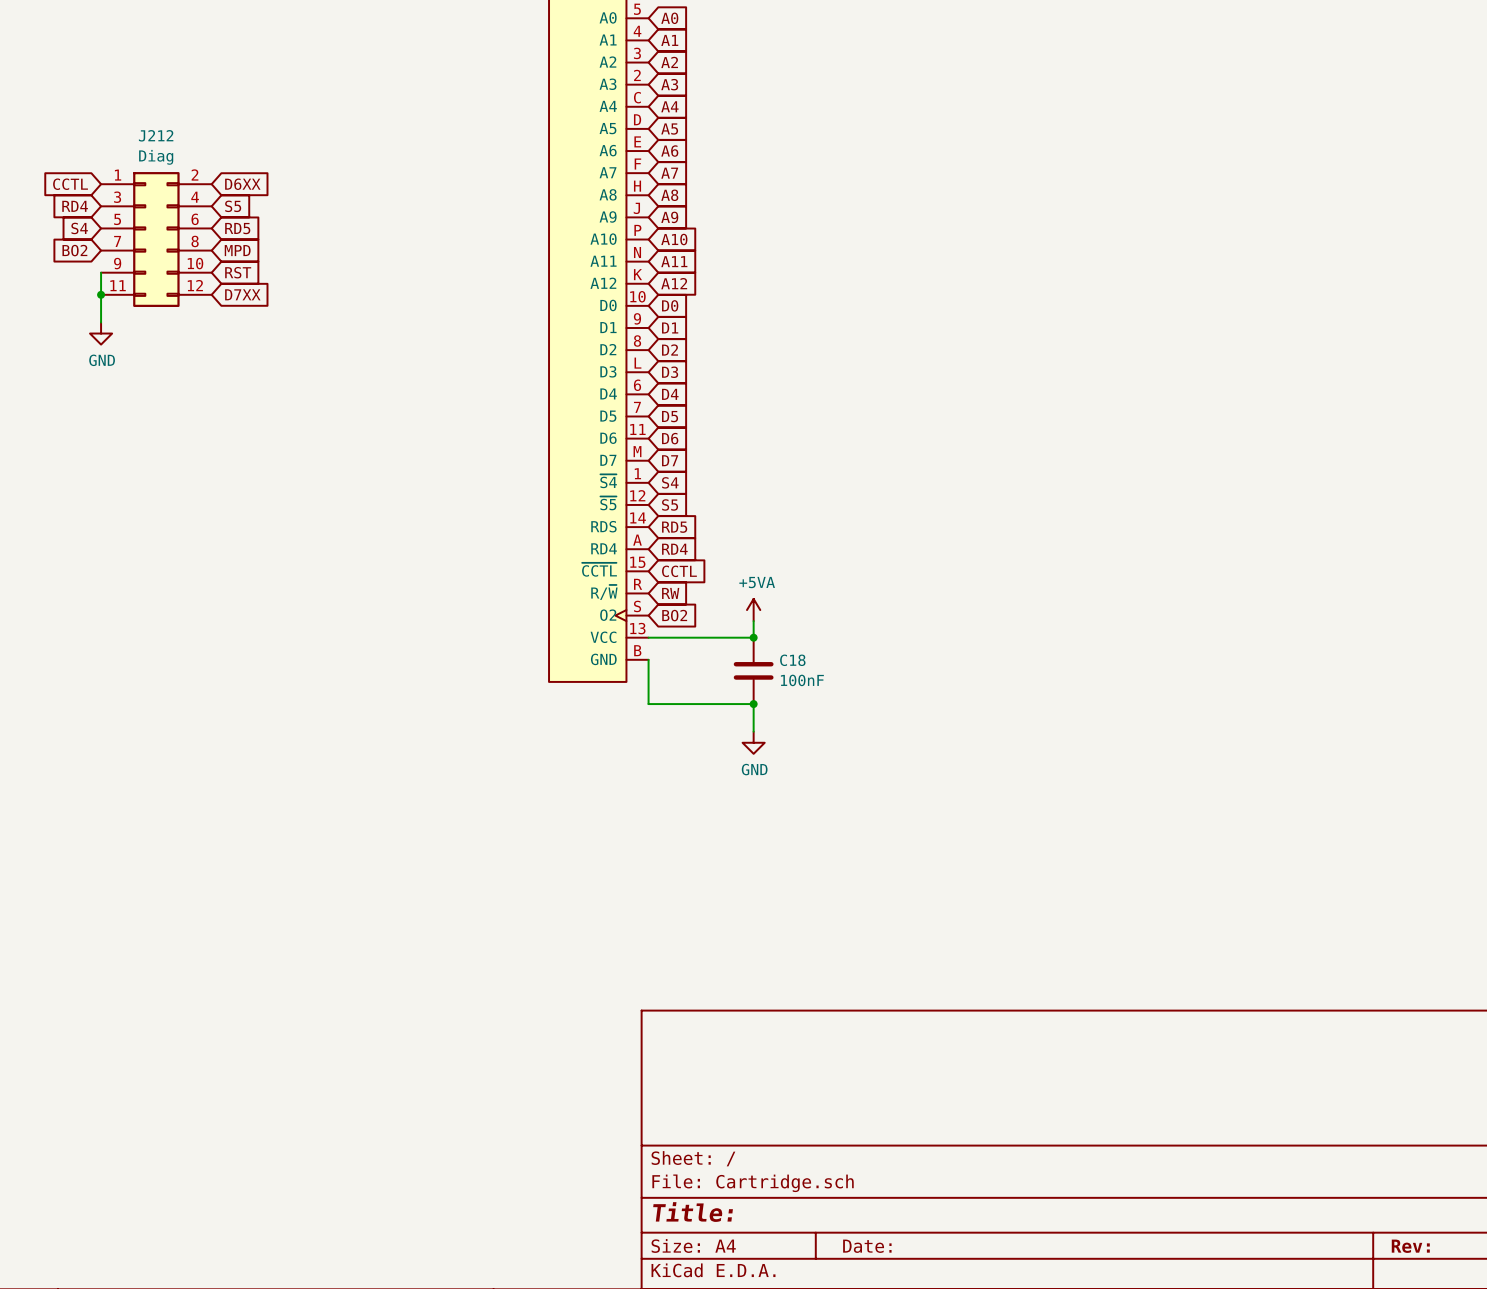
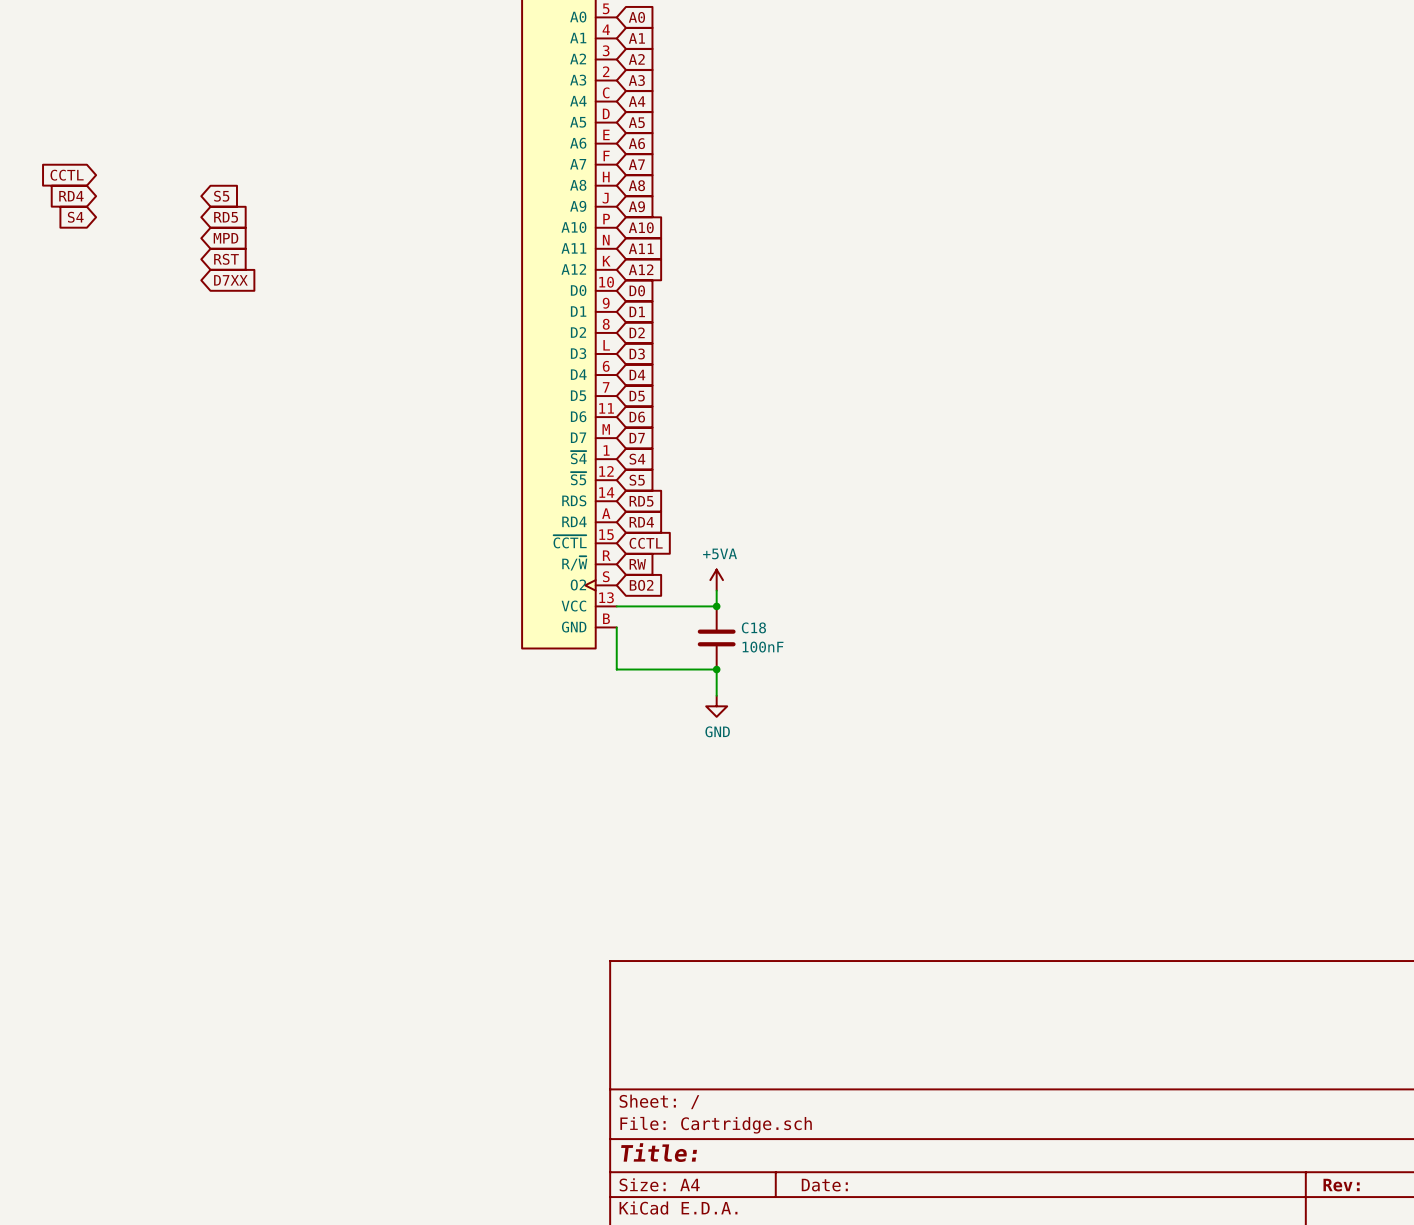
global label: D6XX (242, 184) -> none
J212: Diag (156, 239) -> none
global label: BO2 (74, 250) -> none
wire: (101, 272) (101, 322) -> none
junction: (101, 294) -> none
power symbol: GND (101, 333) -> none

